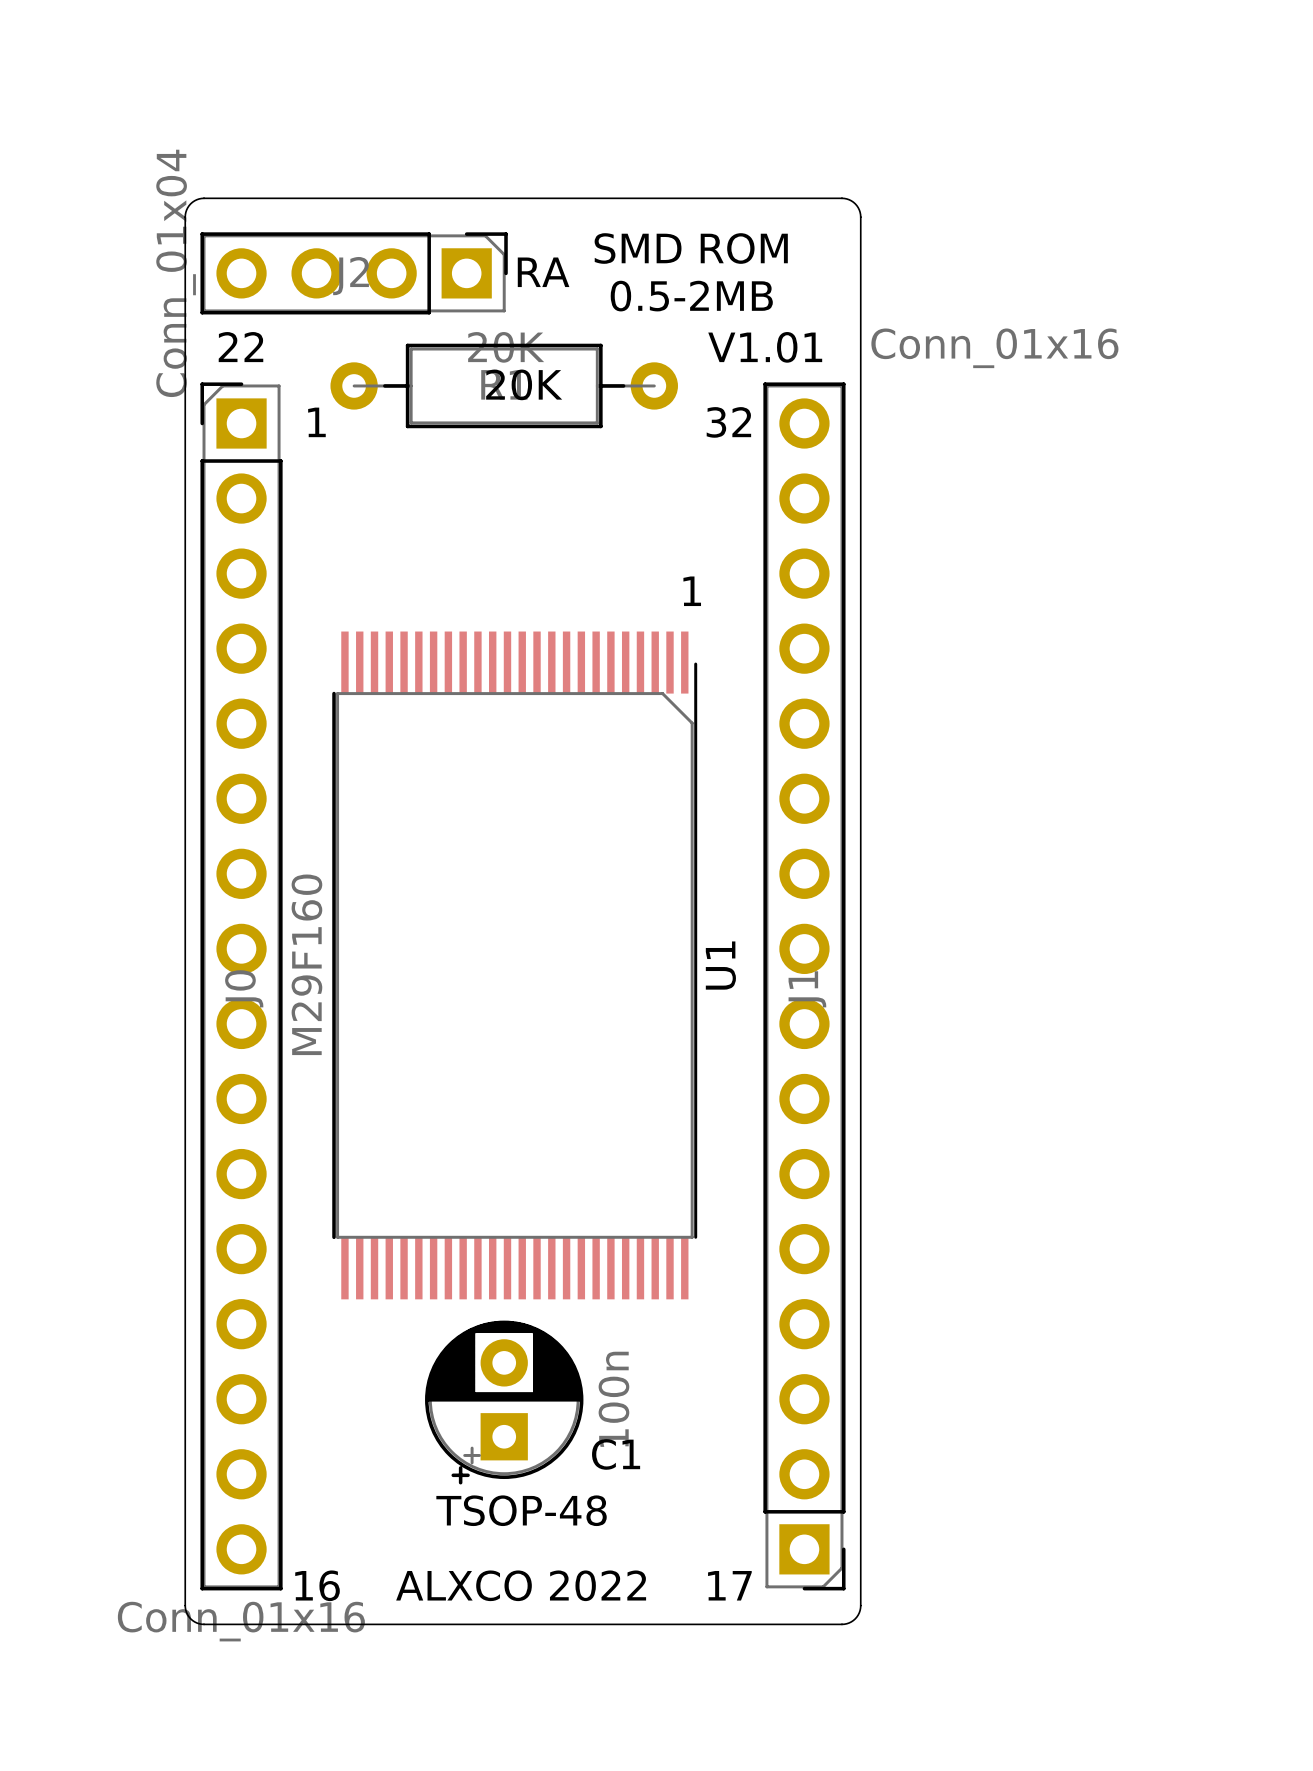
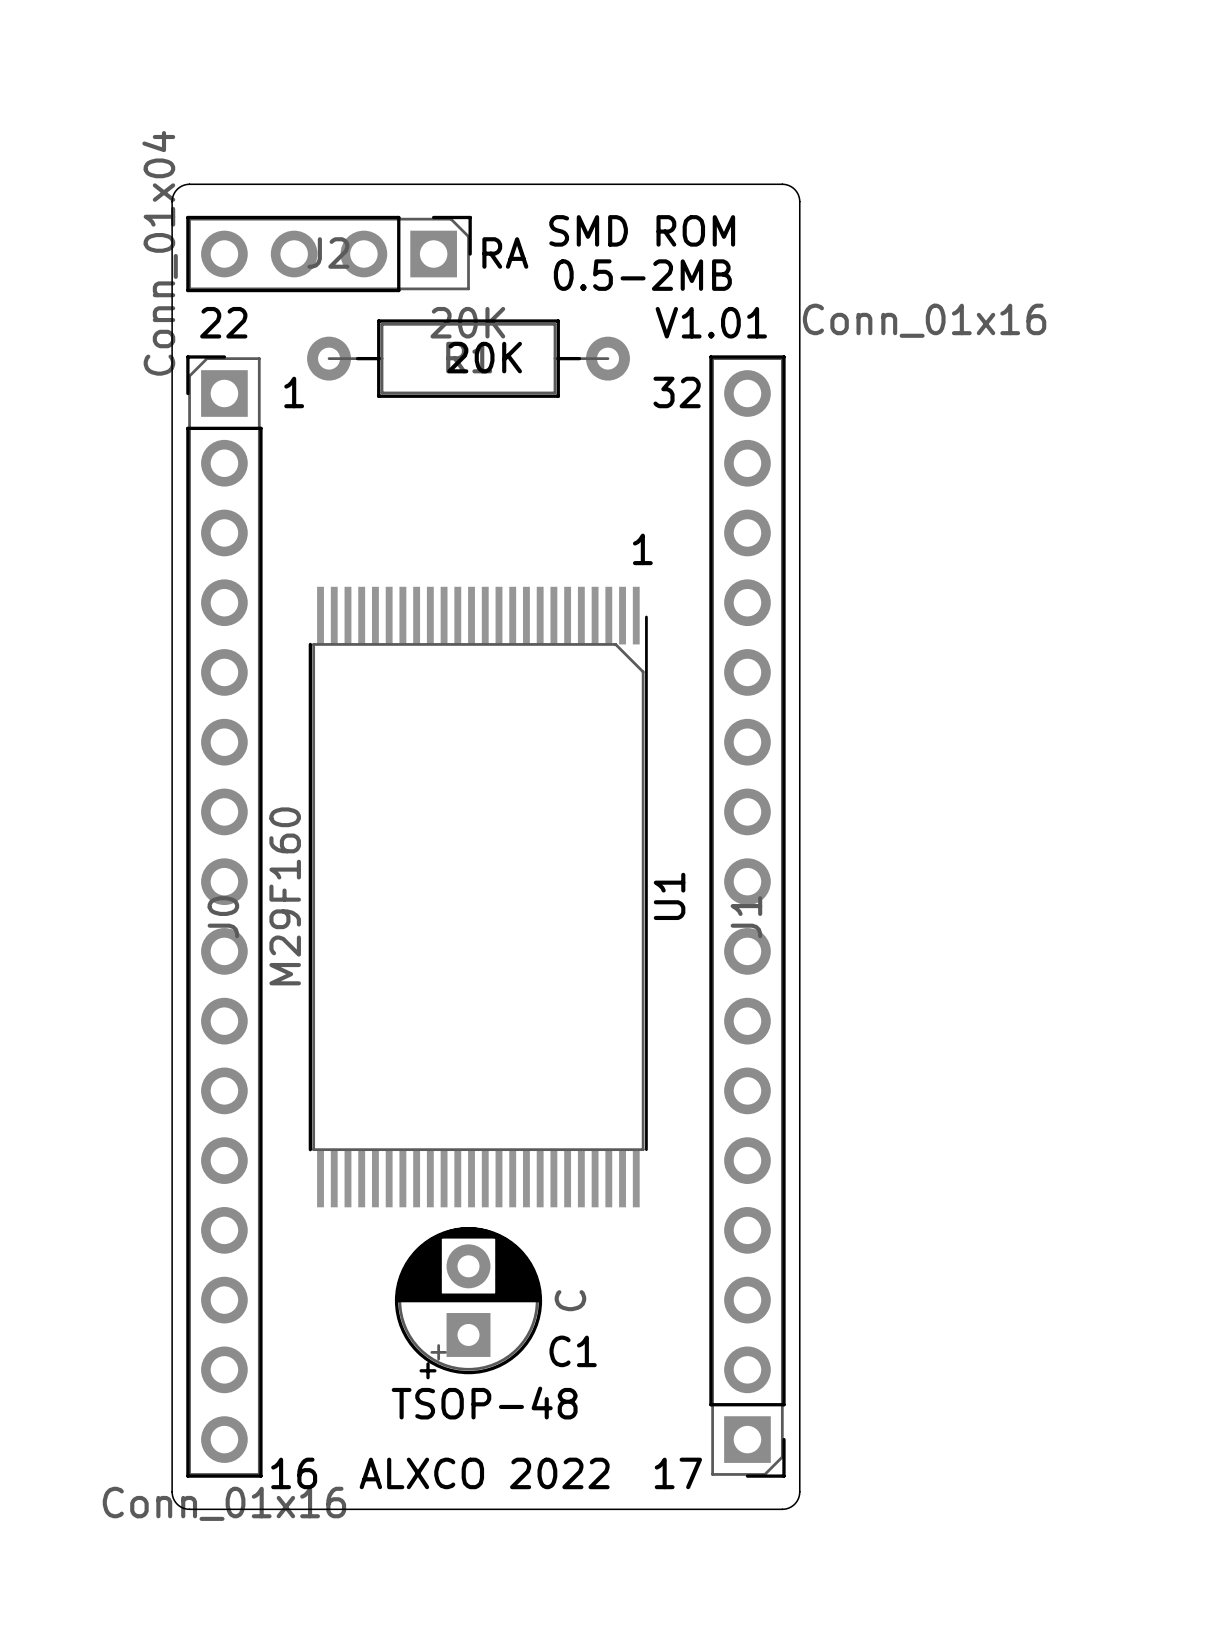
C1 value: 100n (613, 1399) -> C (570, 1300)

